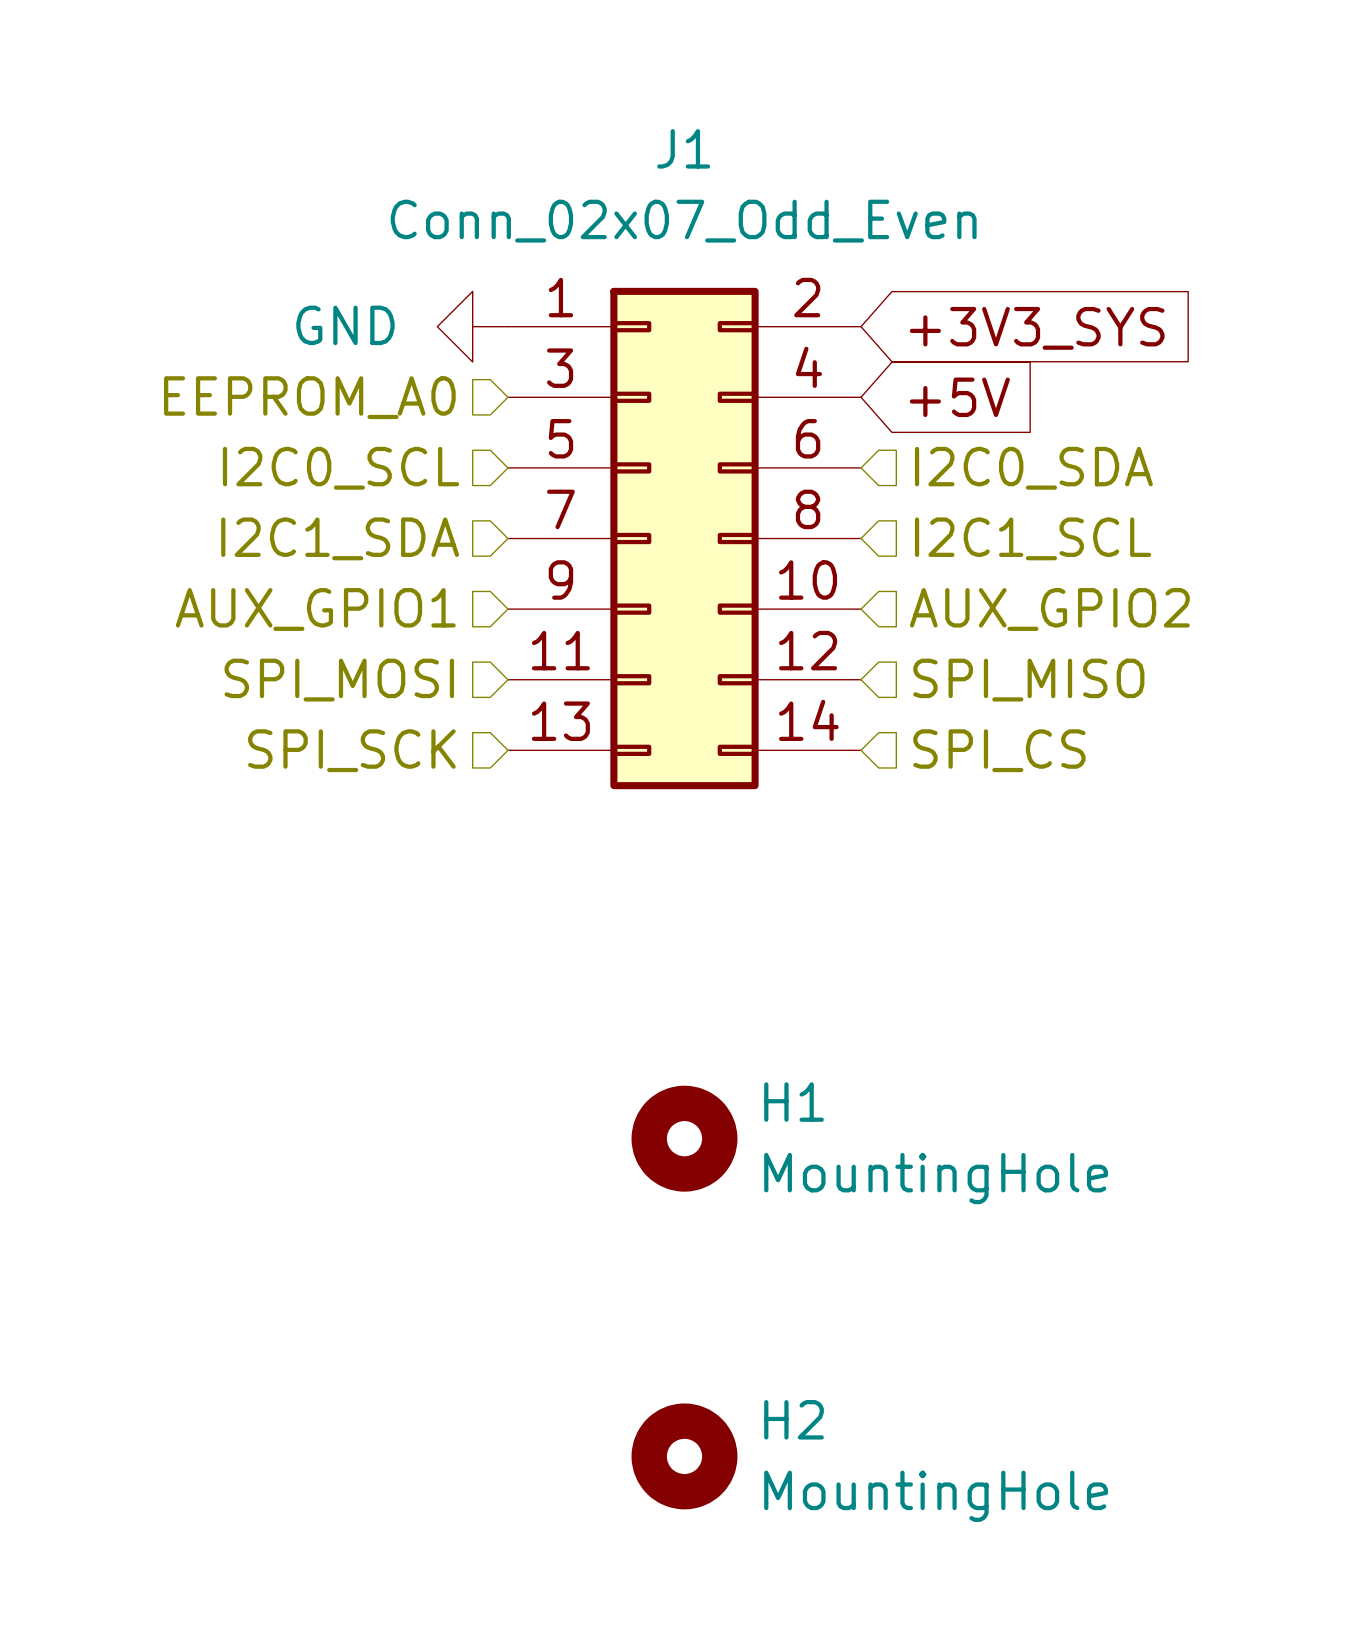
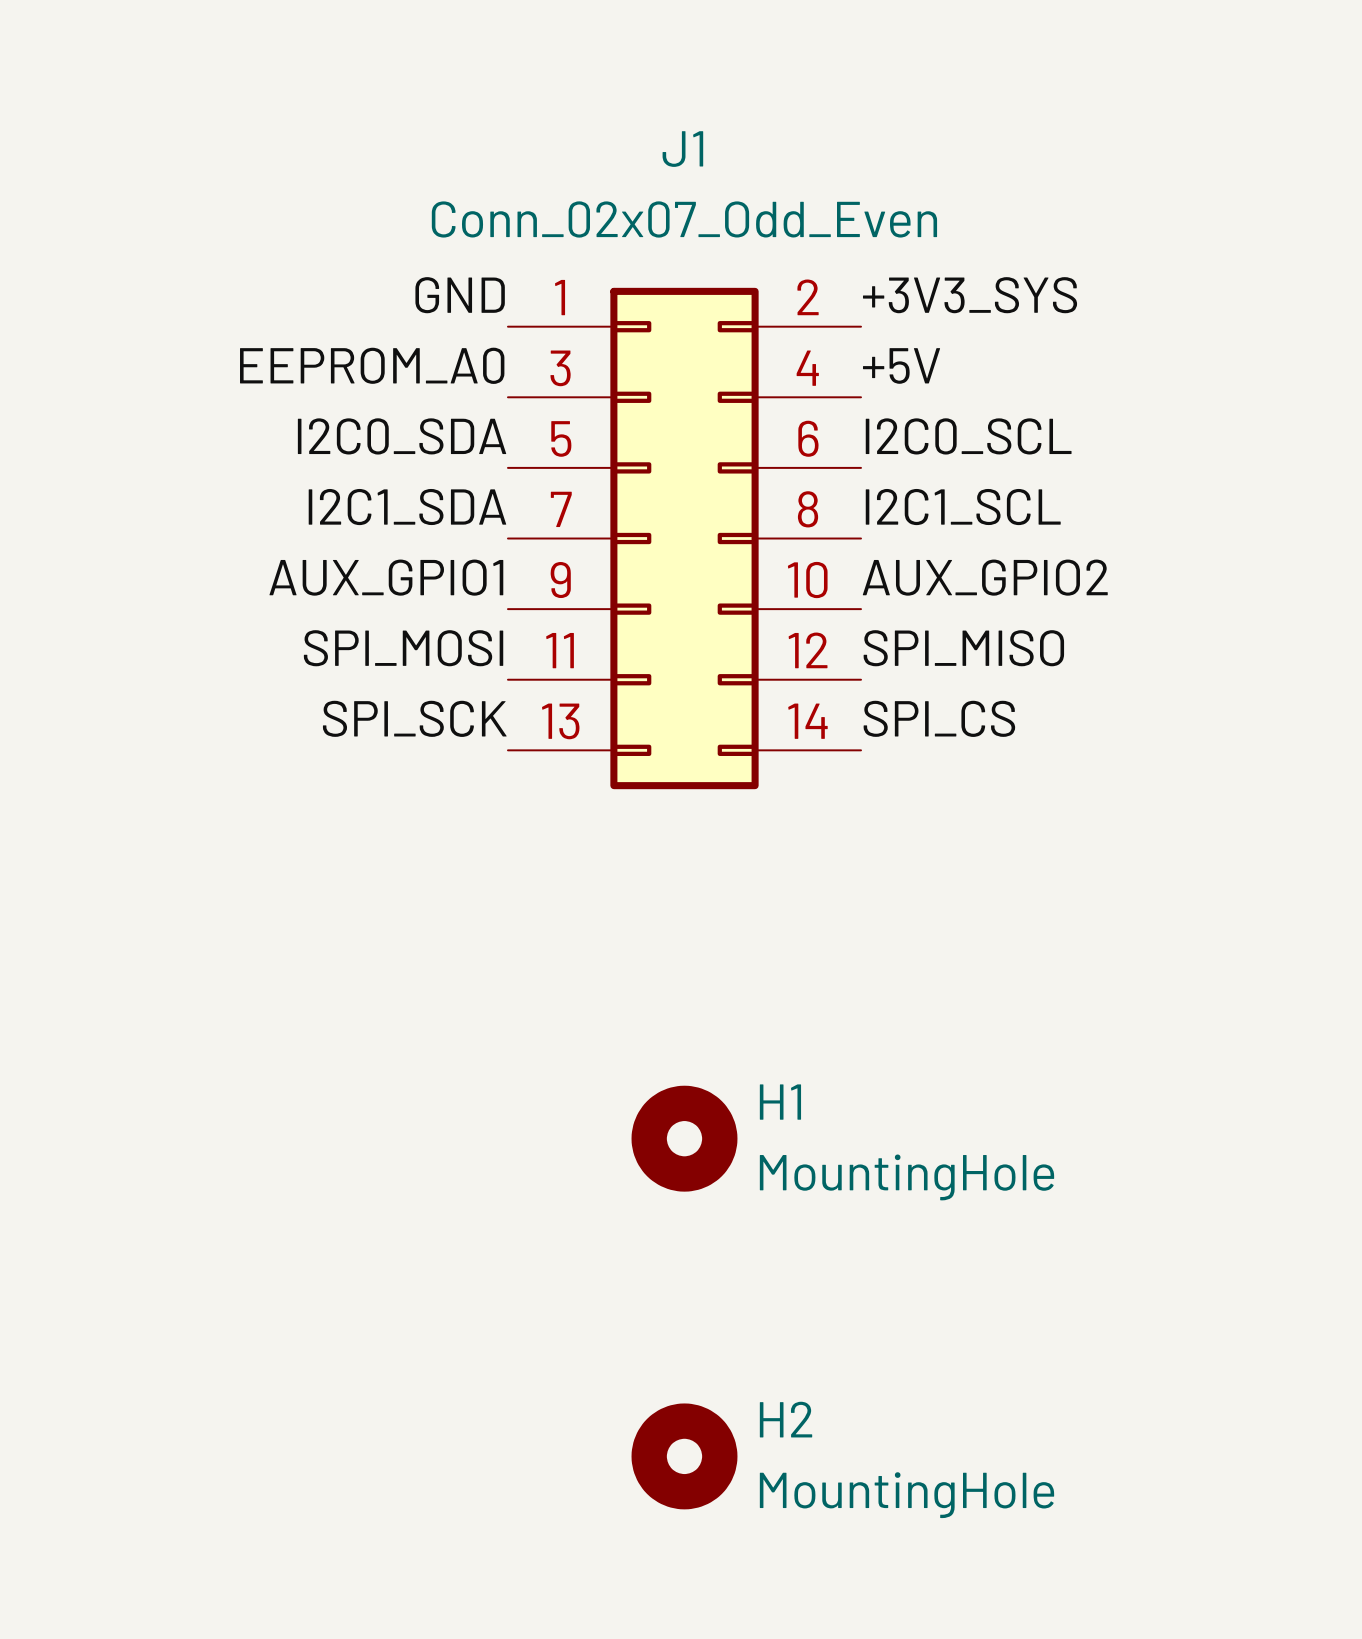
label: none -> GND (460, 295)
label: none -> +3V3_SYS (970, 295)
power symbol: GND (472, 326) -> none
global label: +3V3_SYS (1037, 328) -> none
label: none -> +5V (901, 365)
label: none -> EEPROM_A0 (372, 365)
hierarchical label: EEPROM_A0 (309, 397) -> none
global label: +5V (959, 397) -> none
label: none -> I2C0_SDA (402, 436)
label: none -> I2C0_SCL (968, 436)
hierarchical label: I2C0_SCL (340, 468) -> none
hierarchical label: I2C0_SDA (1033, 468) -> none
label: none -> I2C1_SDA (407, 507)
label: none -> I2C1_SCL (963, 507)
hierarchical label: I2C1_SDA (340, 538) -> none
hierarchical label: I2C1_SCL (1033, 538) -> none
label: none -> AUX_GPIO1 (386, 577)
label: none -> AUX_GPIO2 (985, 577)
hierarchical label: AUX_GPIO1 (315, 609) -> none
hierarchical label: AUX_GPIO2 (1049, 609) -> none
label: none -> SPI_MOSI (403, 648)
label: none -> SPI_MISO (963, 648)
hierarchical label: SPI_MOSI (339, 680) -> none
hierarchical label: SPI_MISO (1028, 680) -> none
label: none -> SPI_SCK (414, 718)
label: none -> SPI_CS (939, 718)
hierarchical label: SPI_SCK (351, 750) -> none
hierarchical label: SPI_CS (999, 750) -> none

